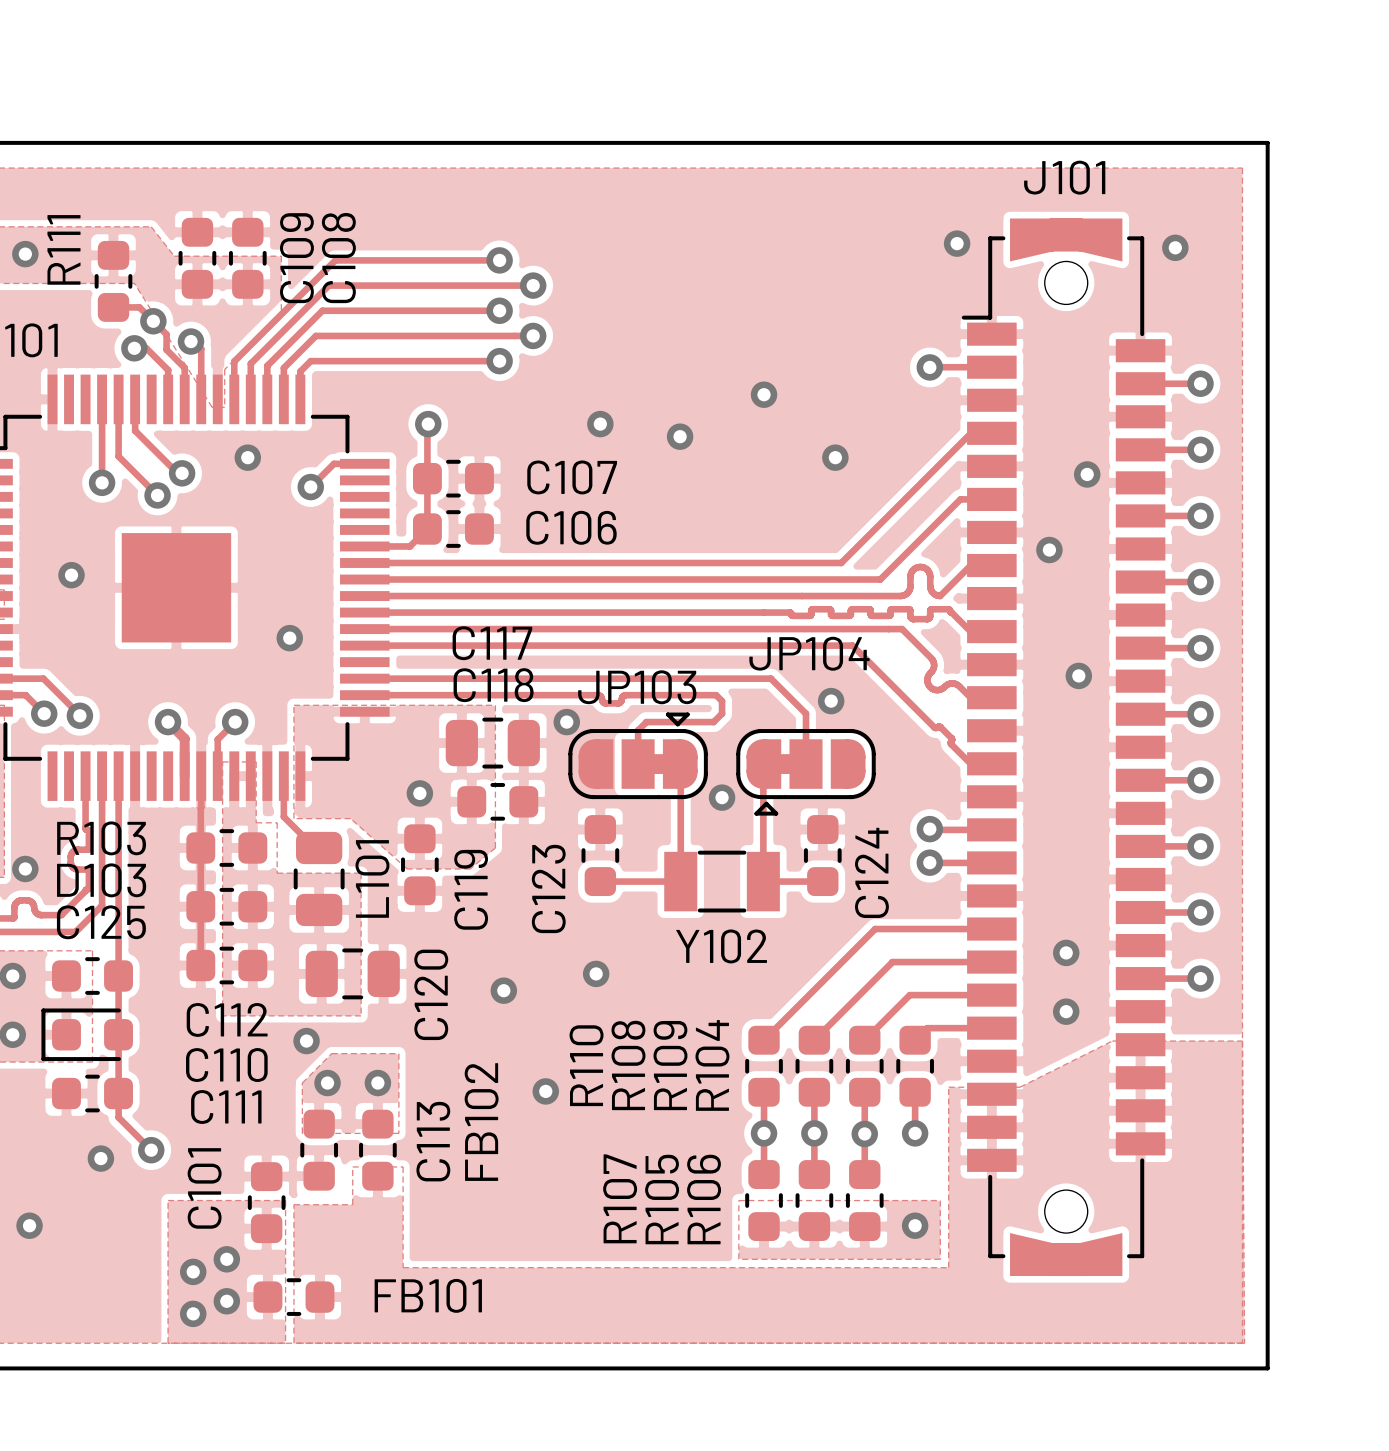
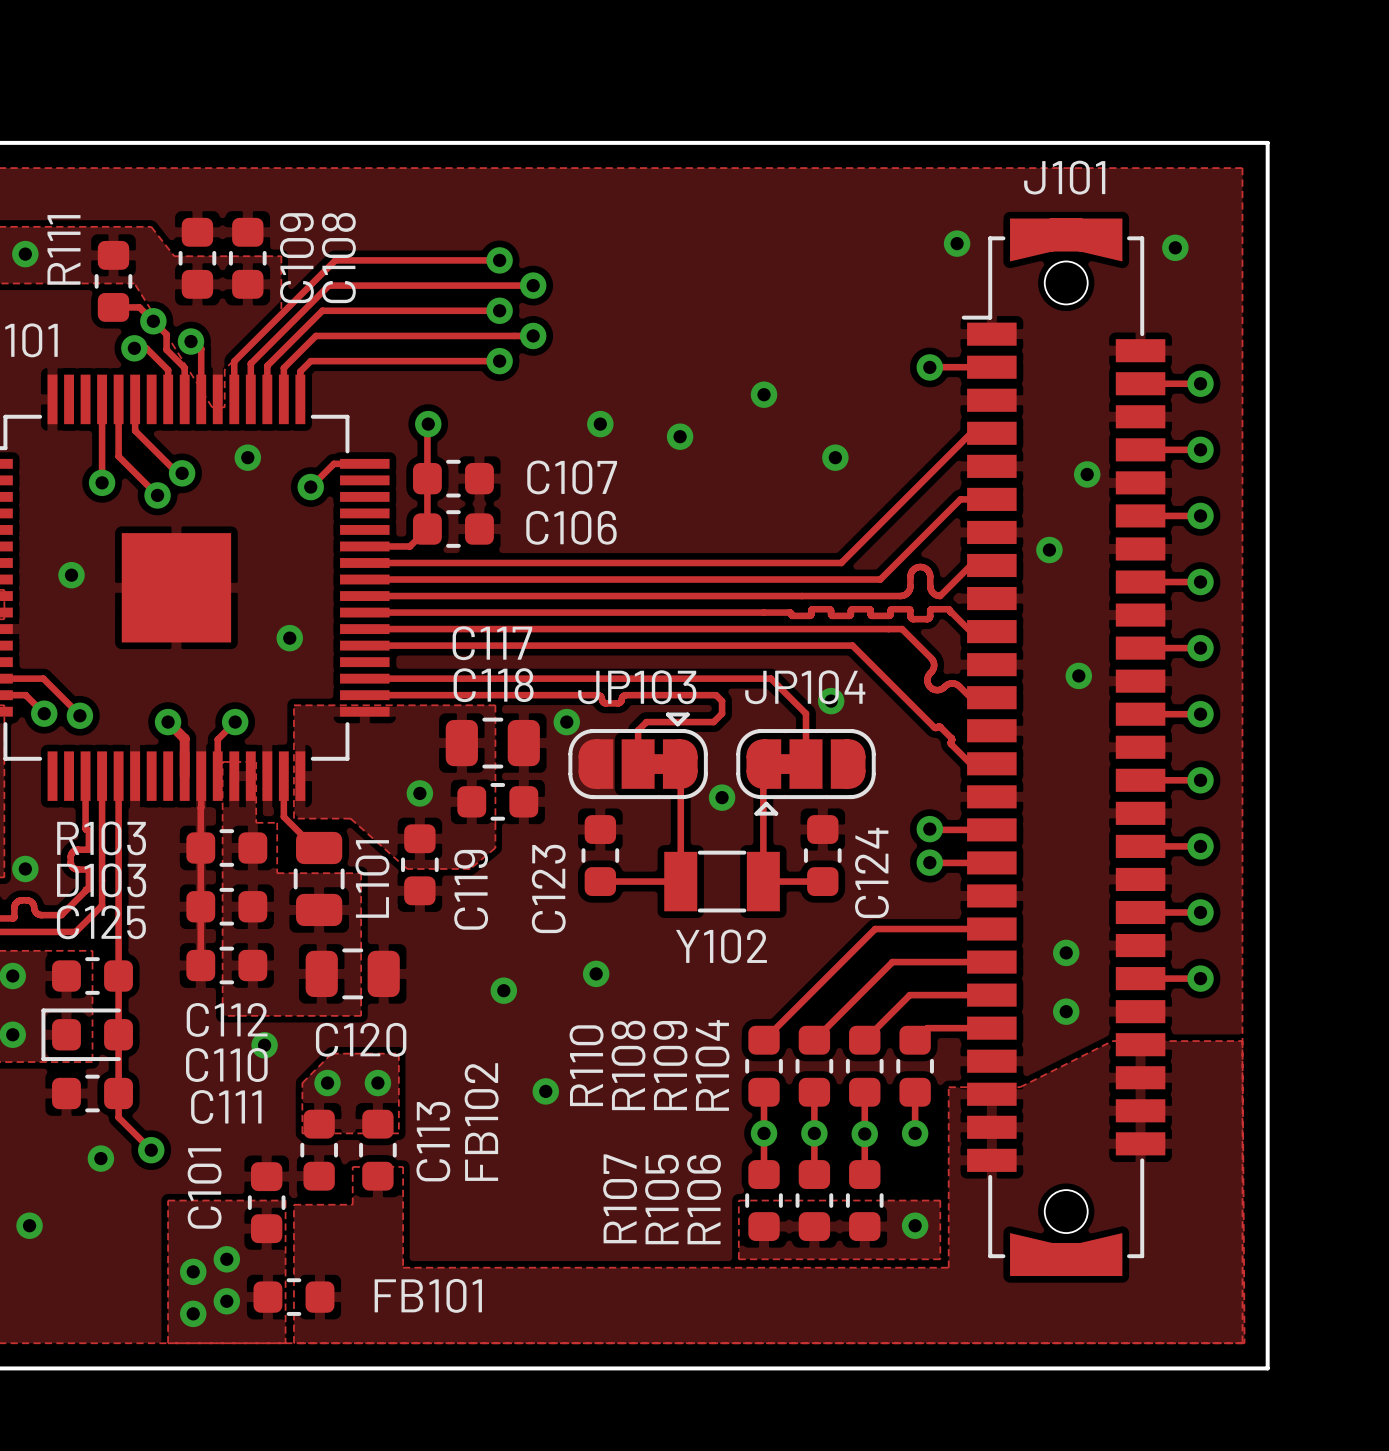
JP104 name position: JP104 (809, 653) -> JP104 (805, 687)
C120 name rotation: 0° (431, 994) -> 90° clockwise (361, 1039)
via position: (306, 1041) -> (264, 1045)

